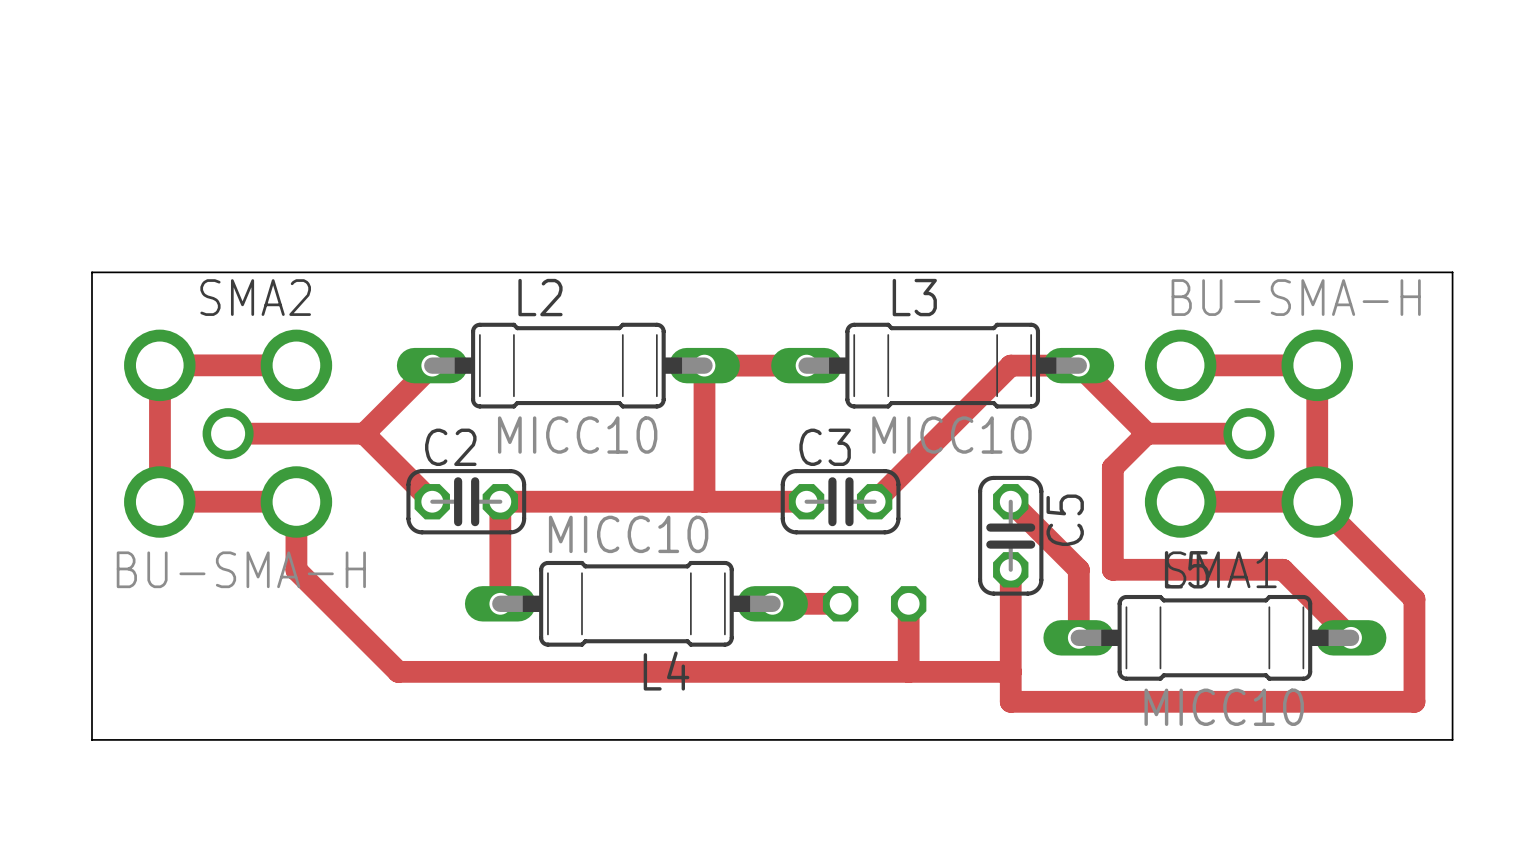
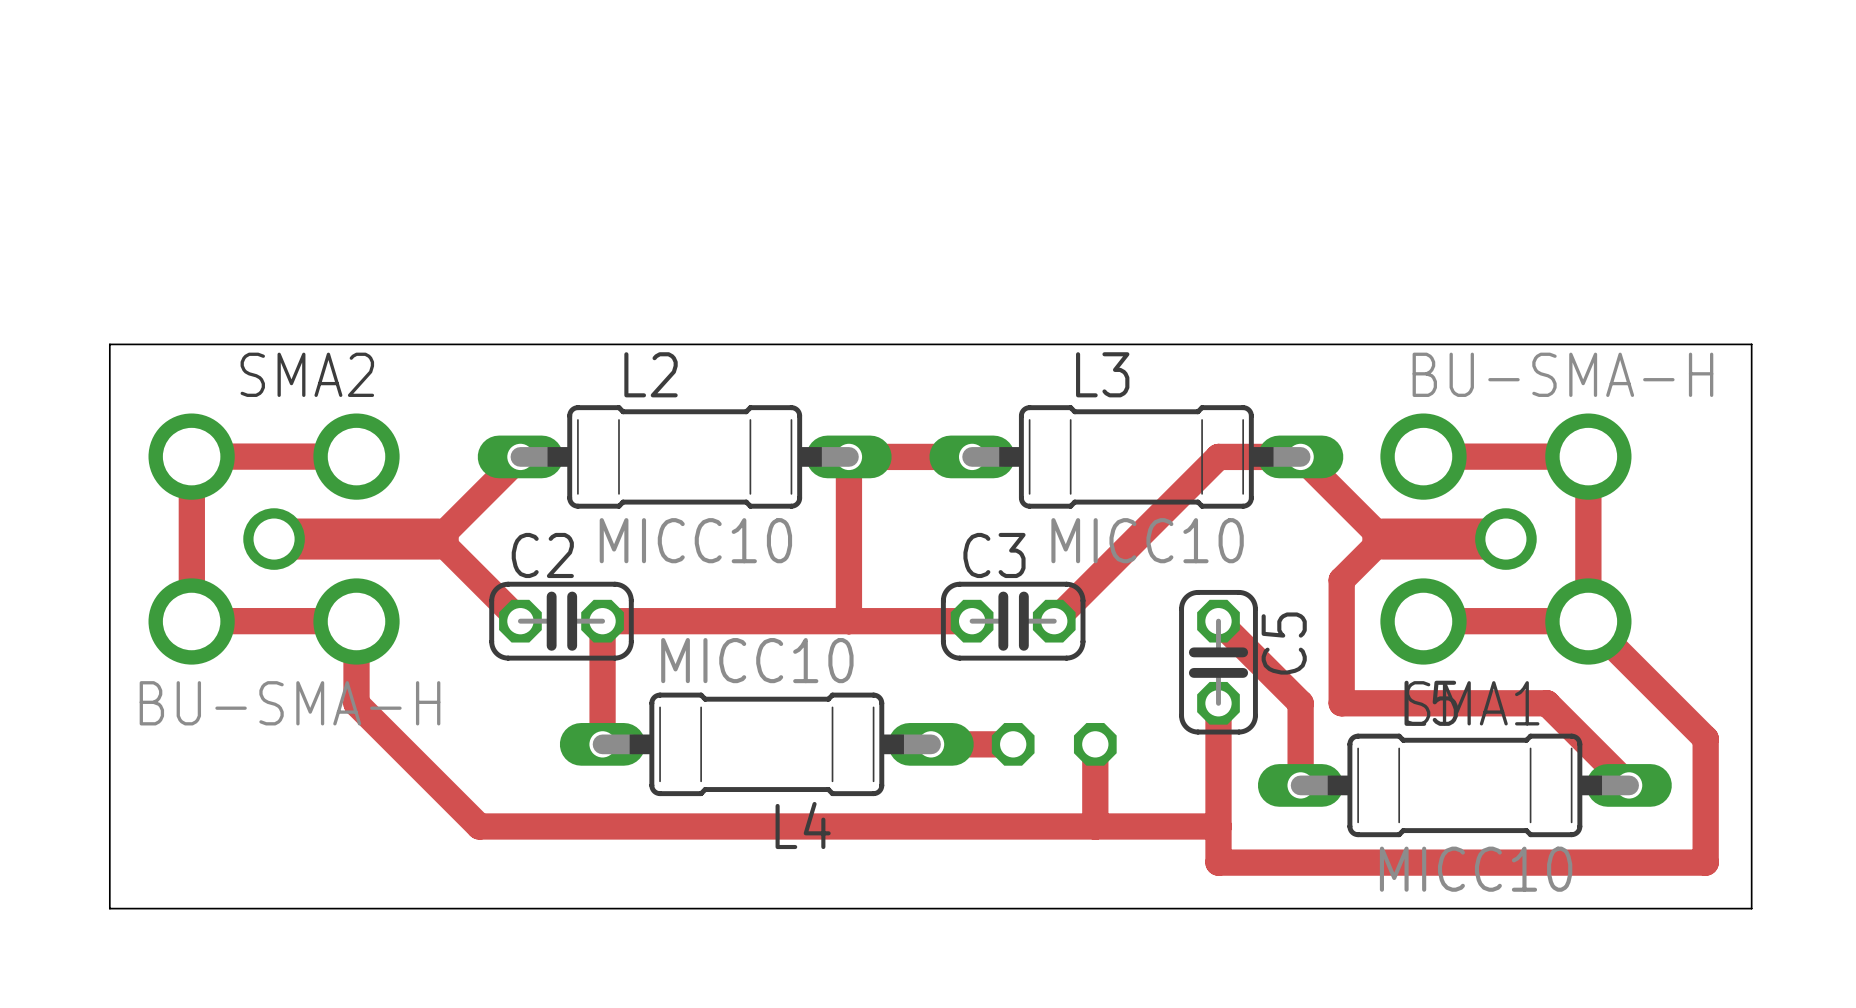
top track width: thin (228, 433) (364, 433) -> thick (274, 539) (438, 539)
top track width: thin (1146, 433) (1248, 433) -> thick (1382, 539) (1505, 539)

